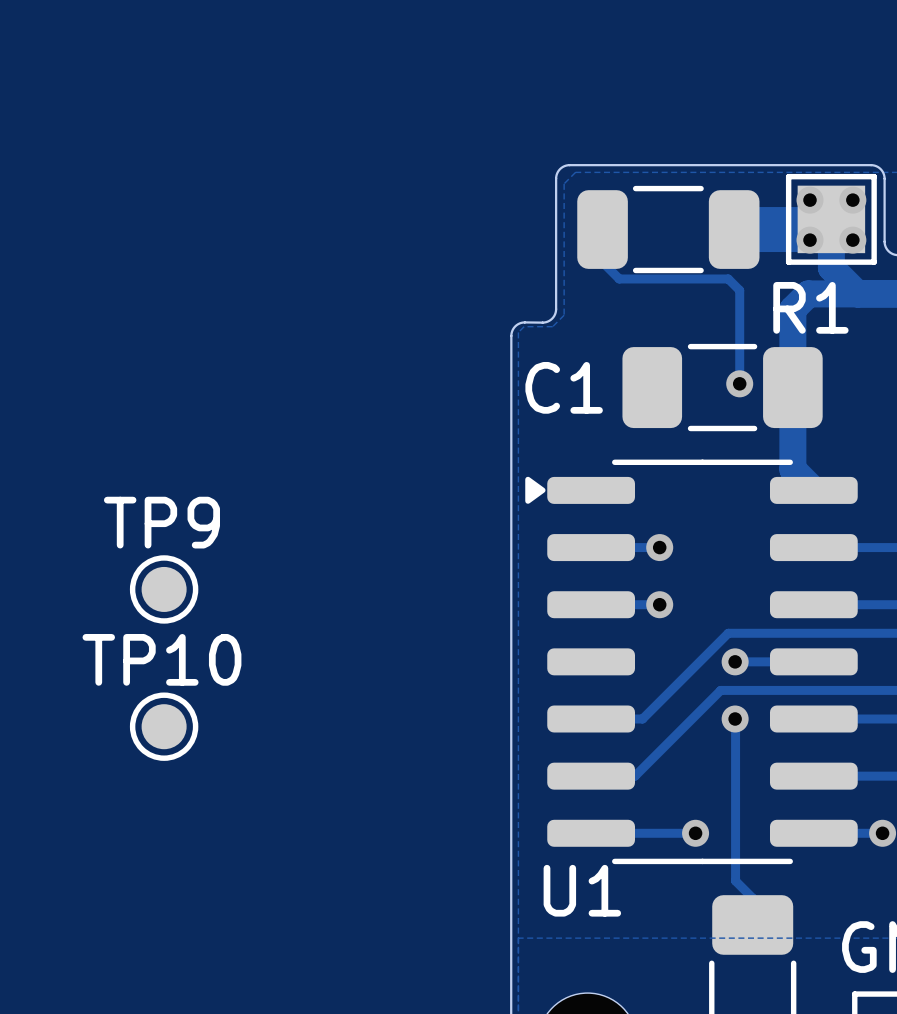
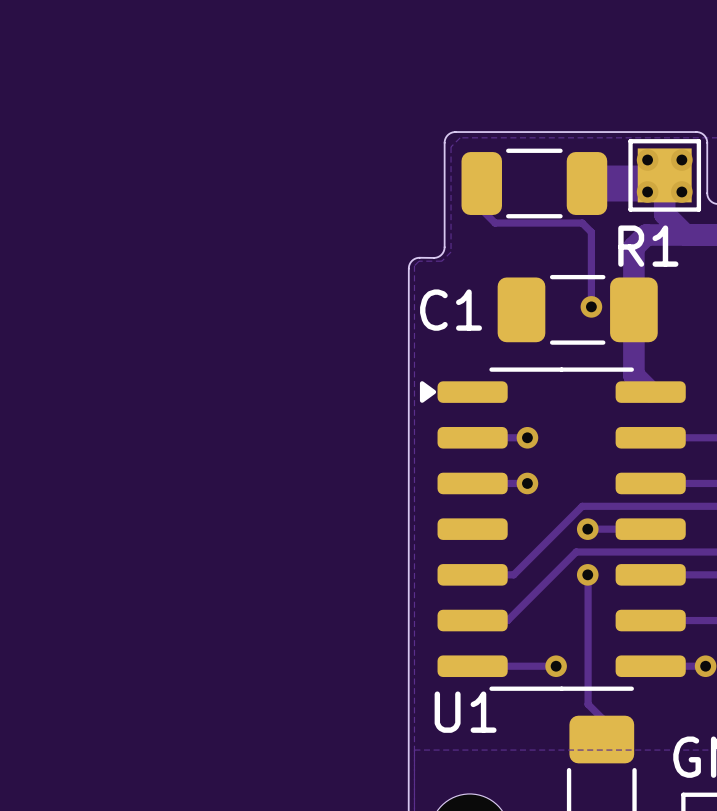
TP9: (164, 589) -> none
TP10: (164, 726) -> none

